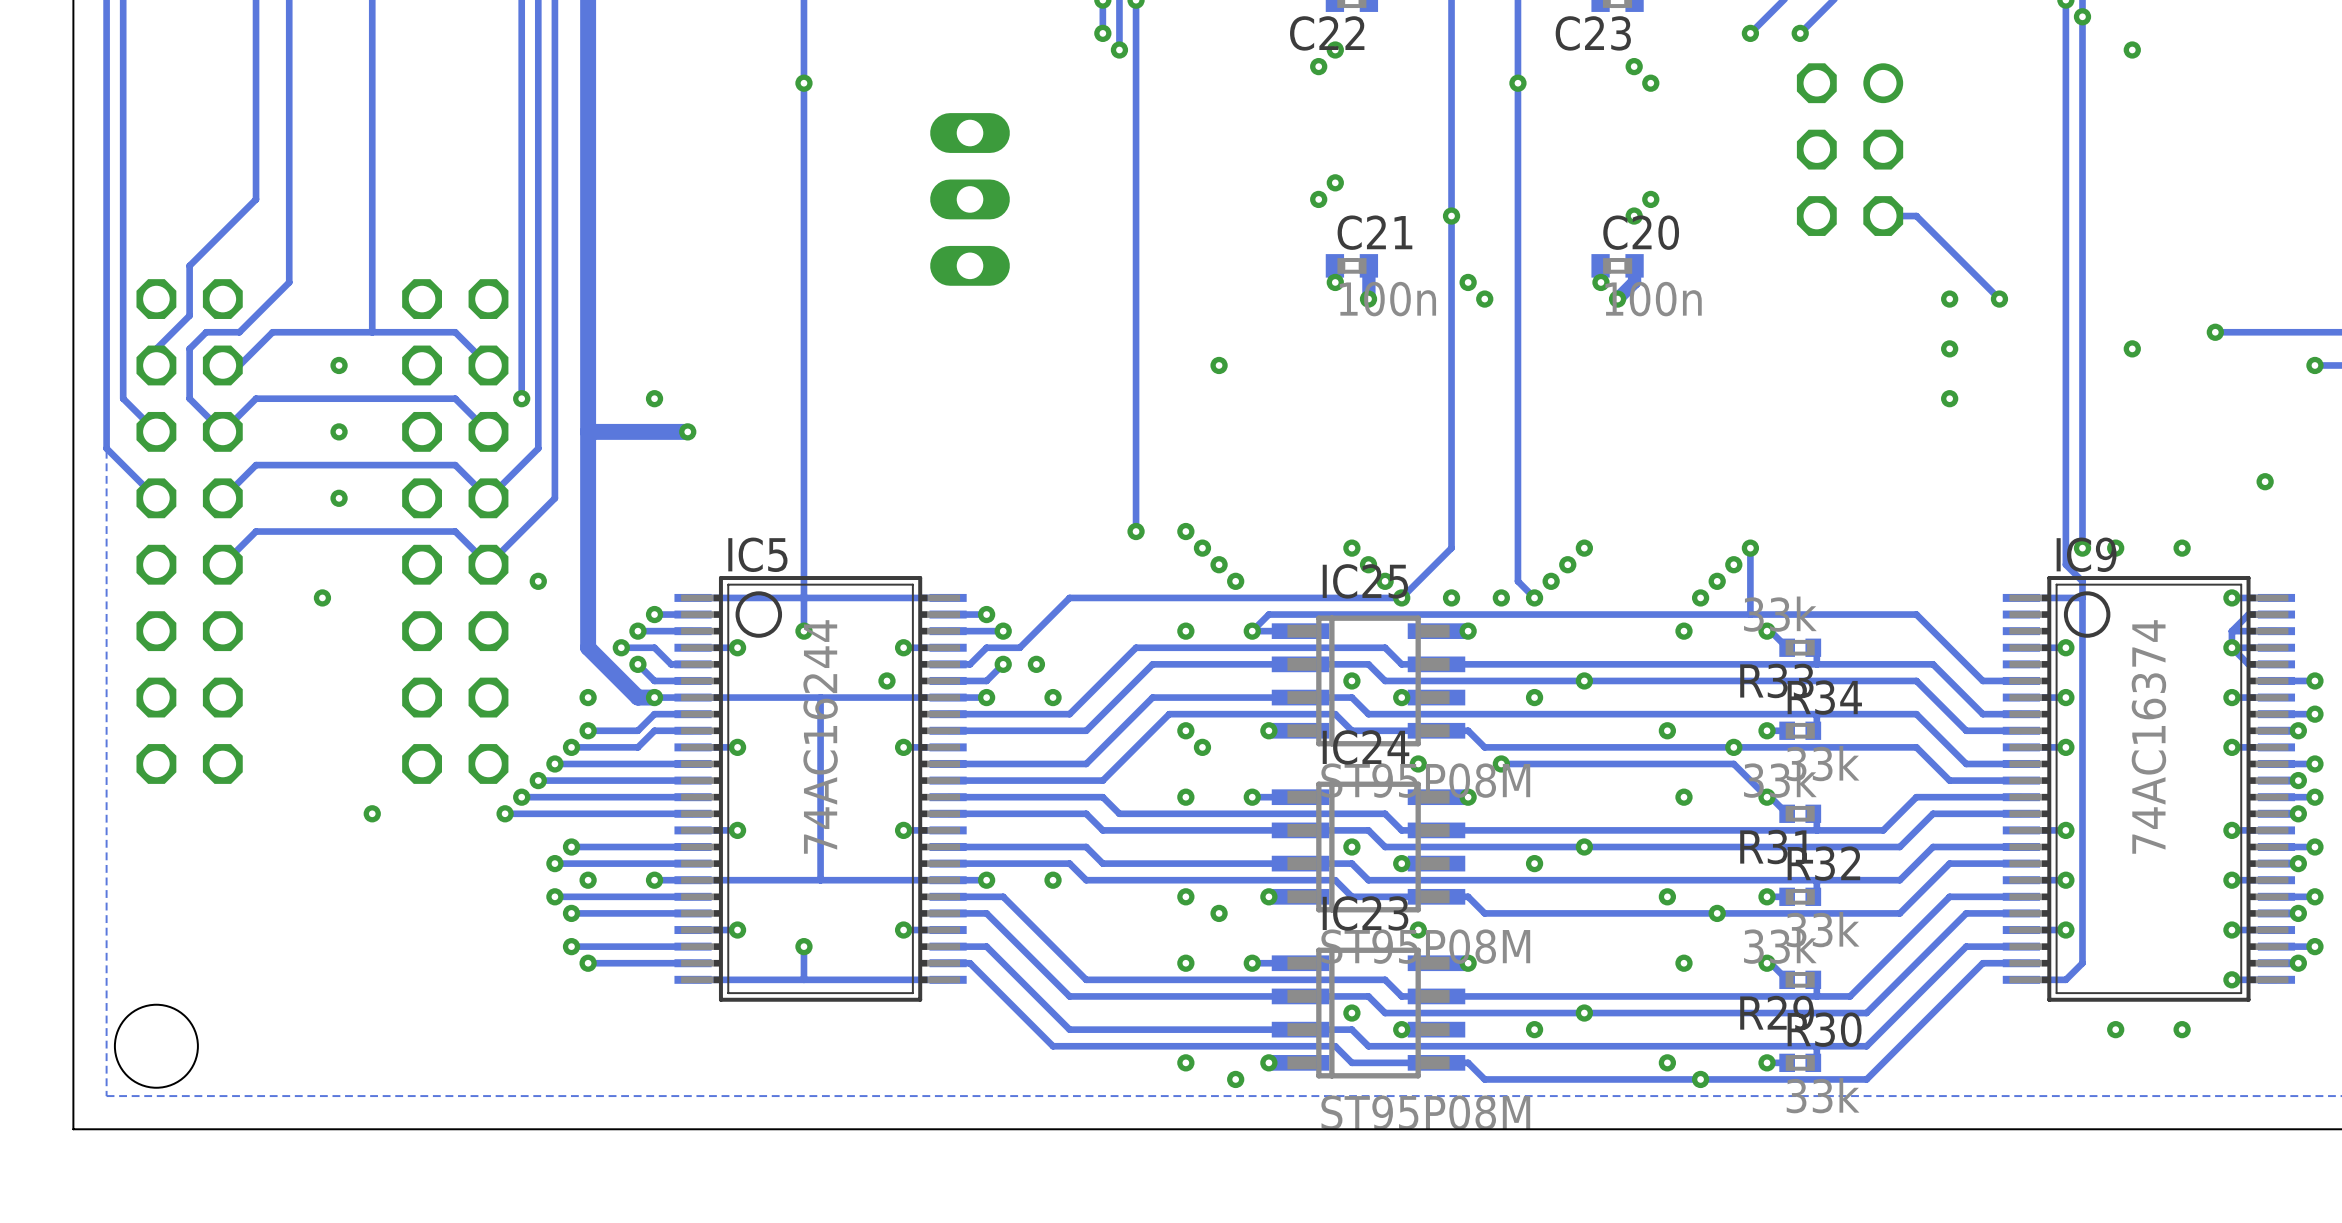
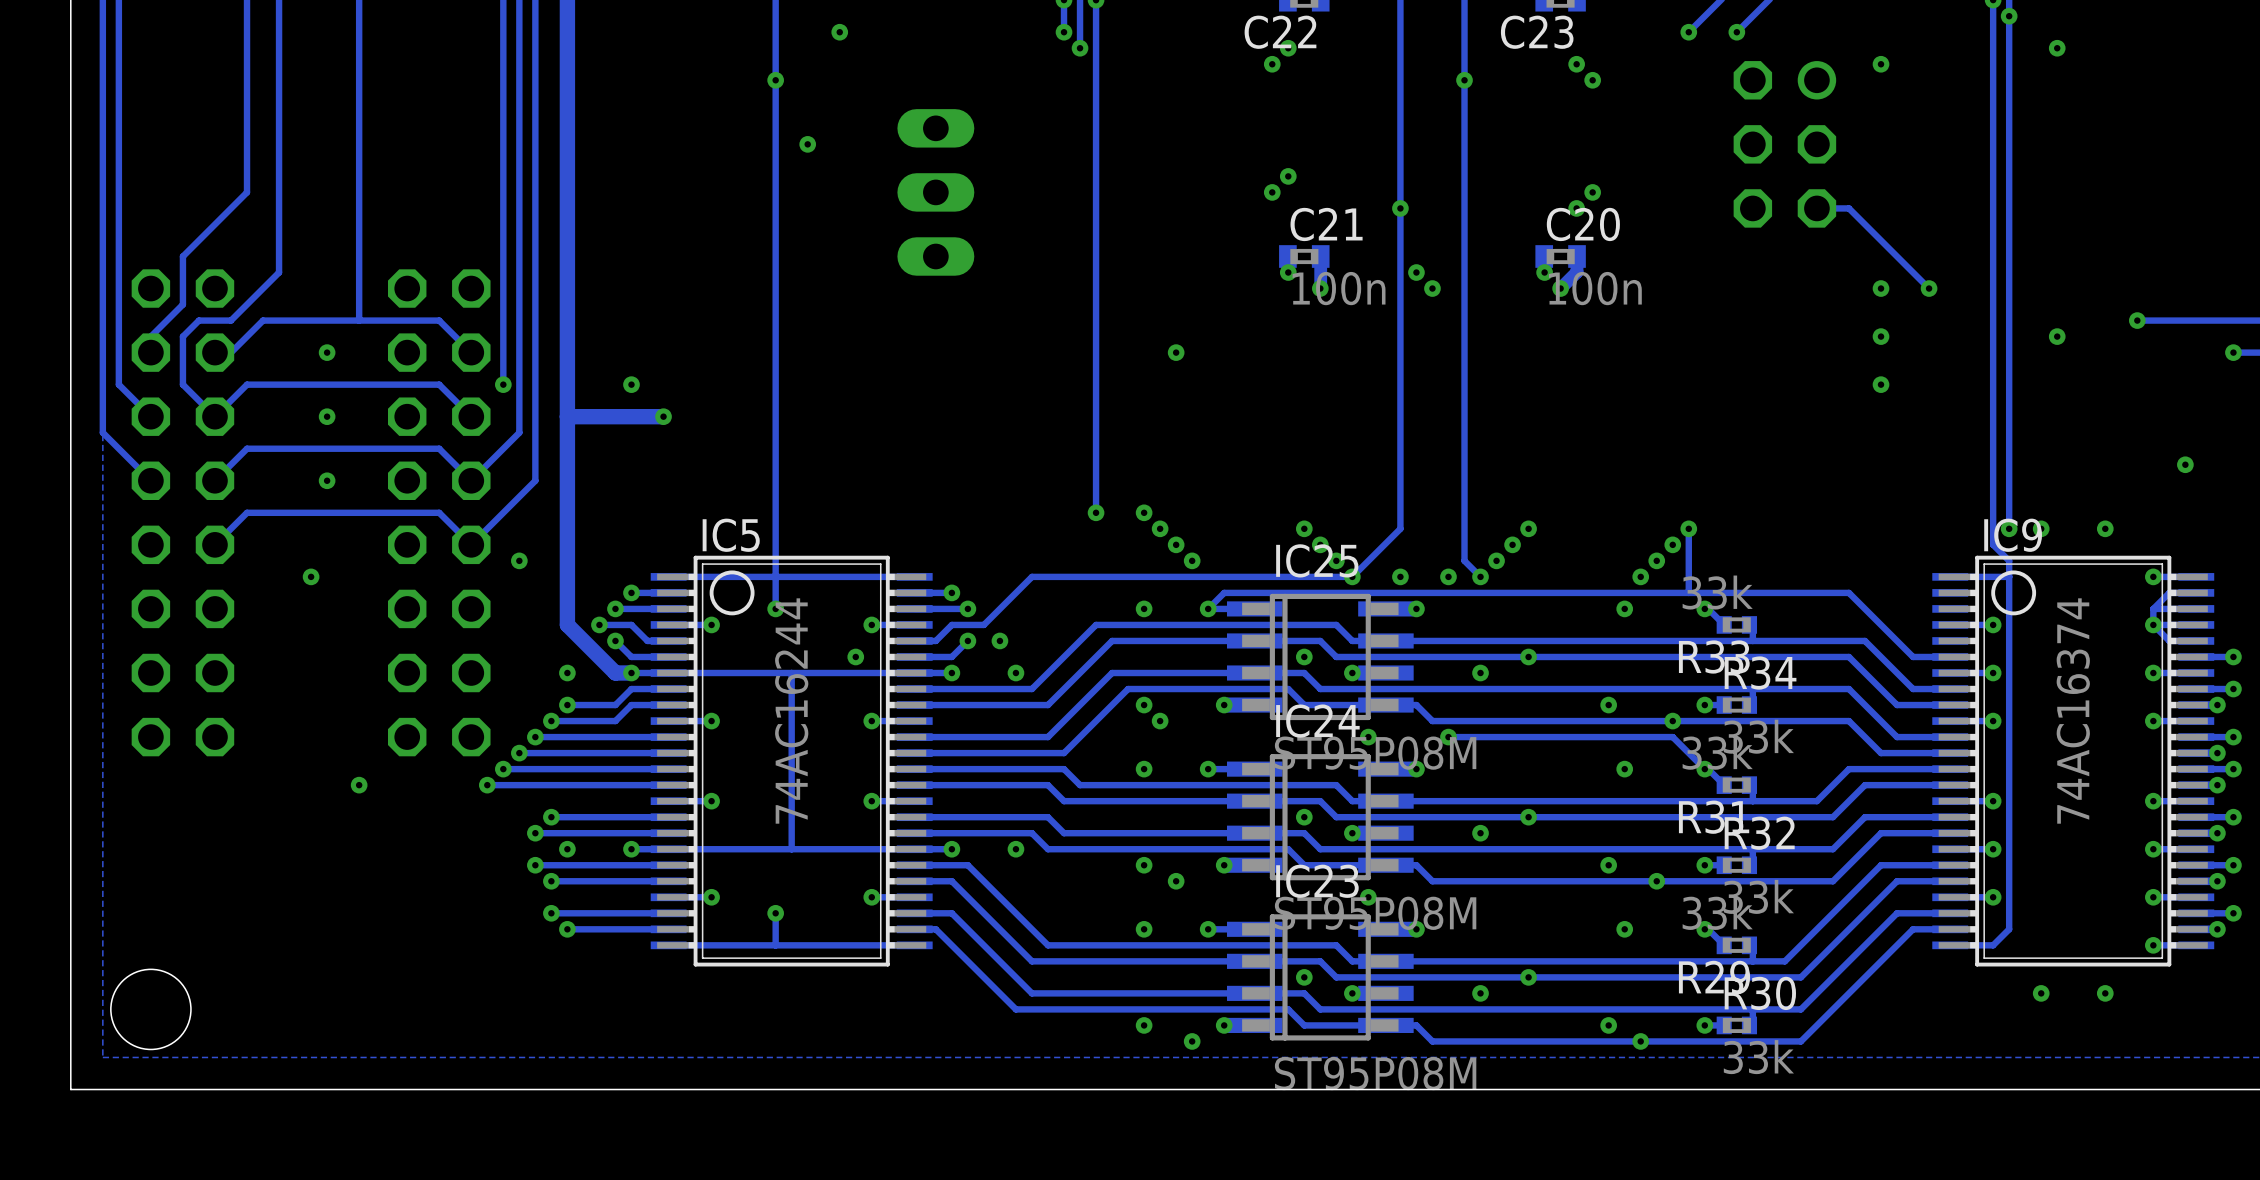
via: none -> (839, 32)
via: none -> (1881, 64)
via: none -> (807, 144)

